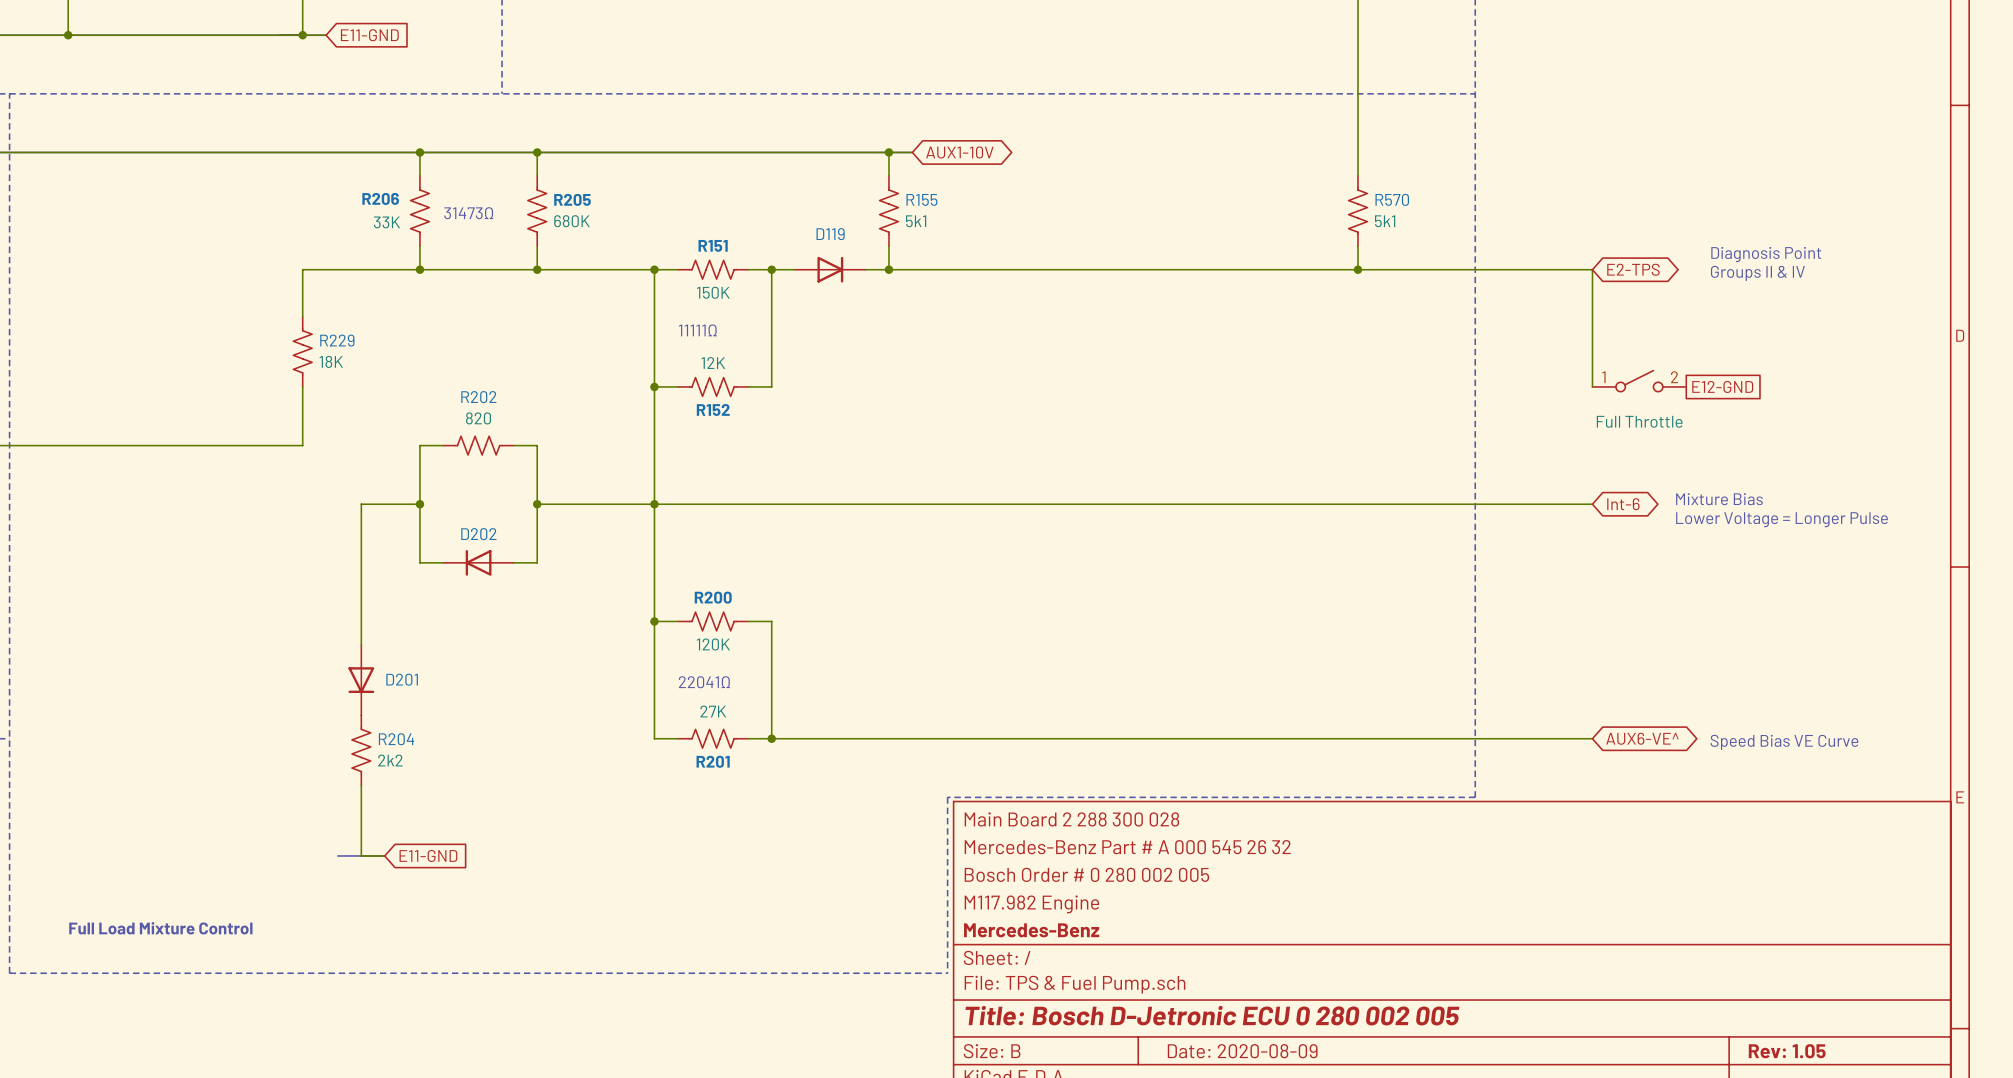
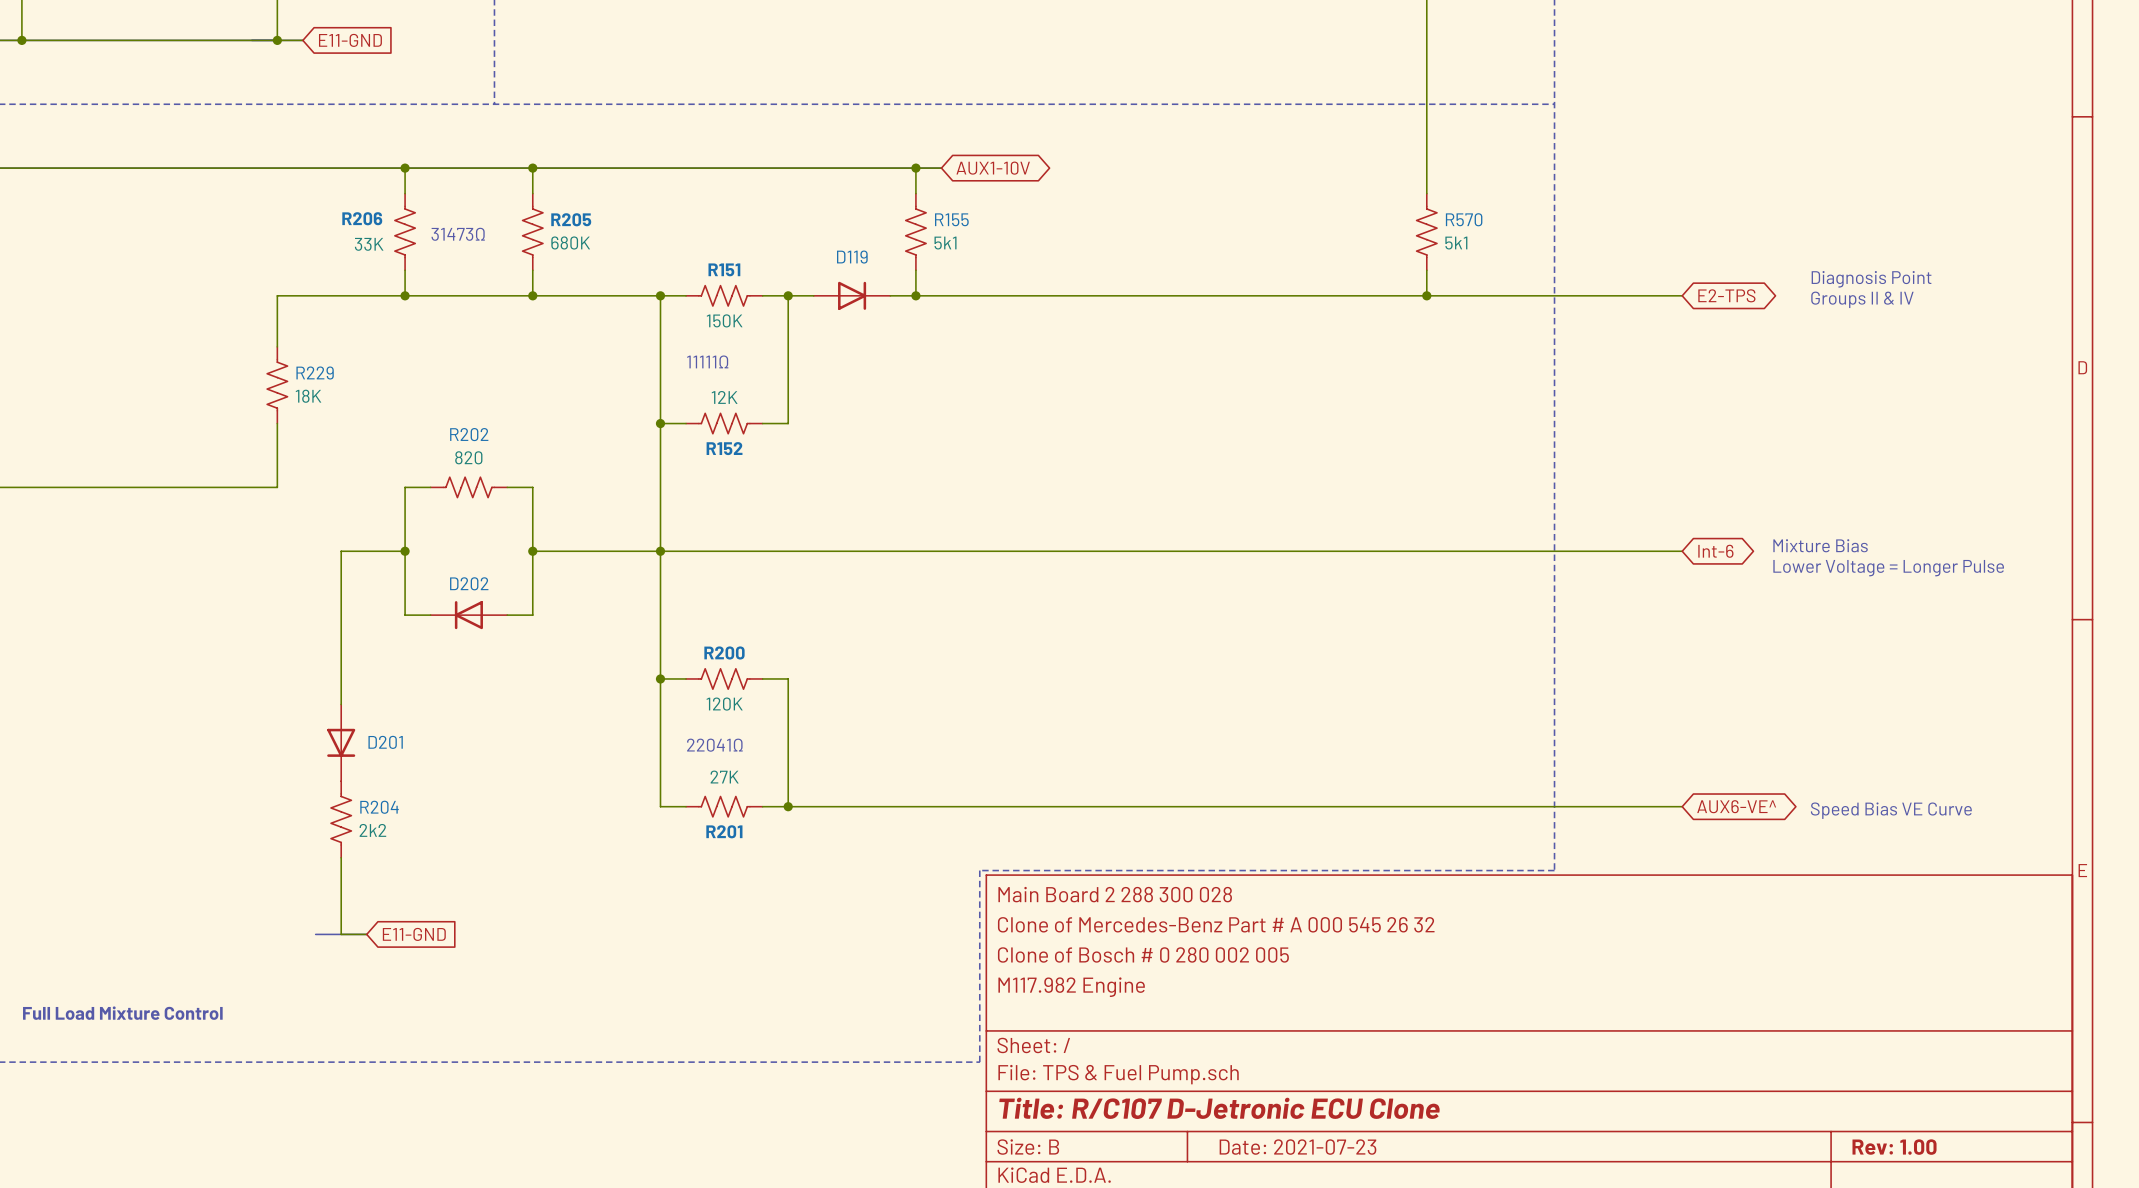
wire: (1592, 269) (1592, 386) -> none
part: Full Throttle (1639, 381) -> none
global label: E12-GND (1722, 386) -> none
title block: Mercedes-Benz Part # A 000 545 26 32 (1127, 847) -> Clone of Mercedes-Benz Part # A 000 545 26 32 (1216, 924)
title block: Bosch Order # 0 280 002 005 (1086, 874) -> Clone of Bosch # 0 280 002 005 (1143, 954)
title block: Mercedes-Benz (1031, 930) -> none
title block: Title: Bosch D-Jetronic ECU 0 280 002 005 (1212, 1015) -> Title: R/C107 D-Jetronic ECU Clone (1219, 1108)
title block: Date: 2020-08-09 (1242, 1051) -> Date: 2021-07-23 (1297, 1147)
title block: Rev: 1.05 (1787, 1051) -> Rev: 1.00 (1894, 1147)

